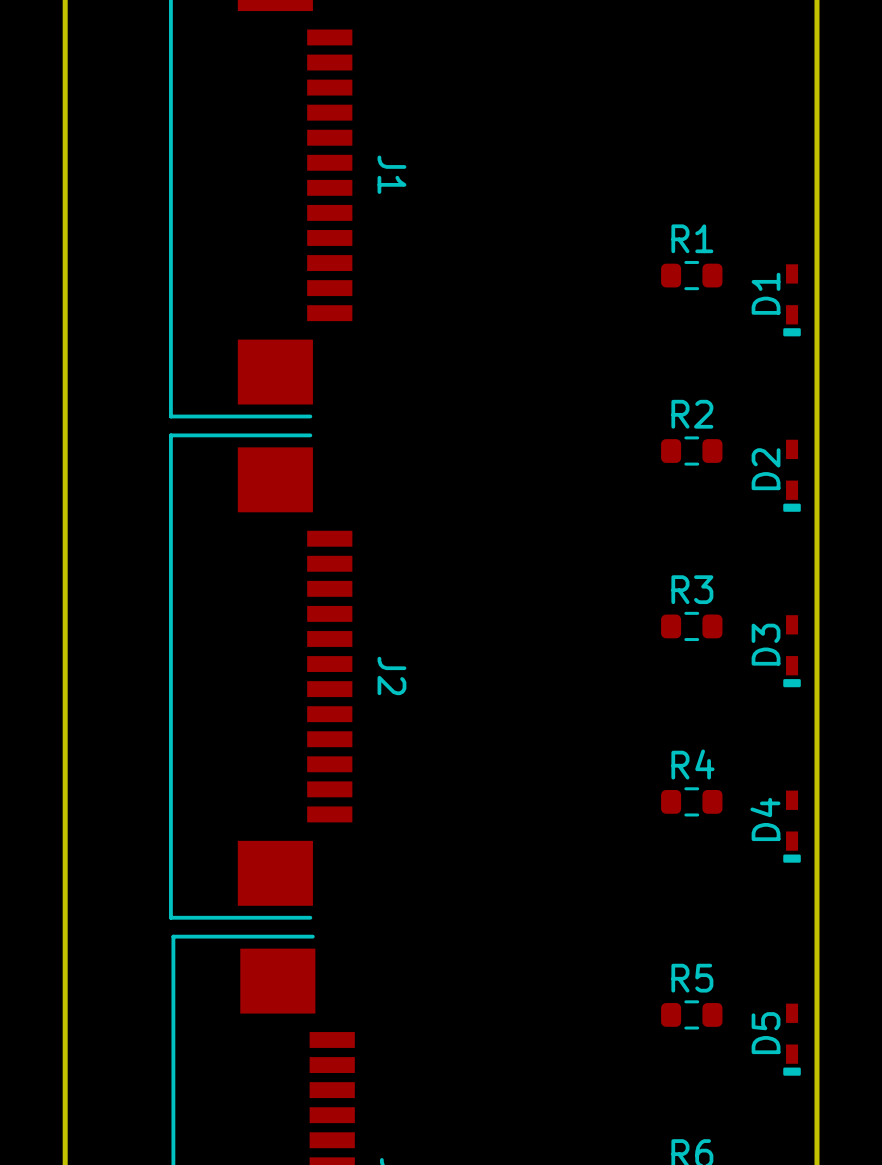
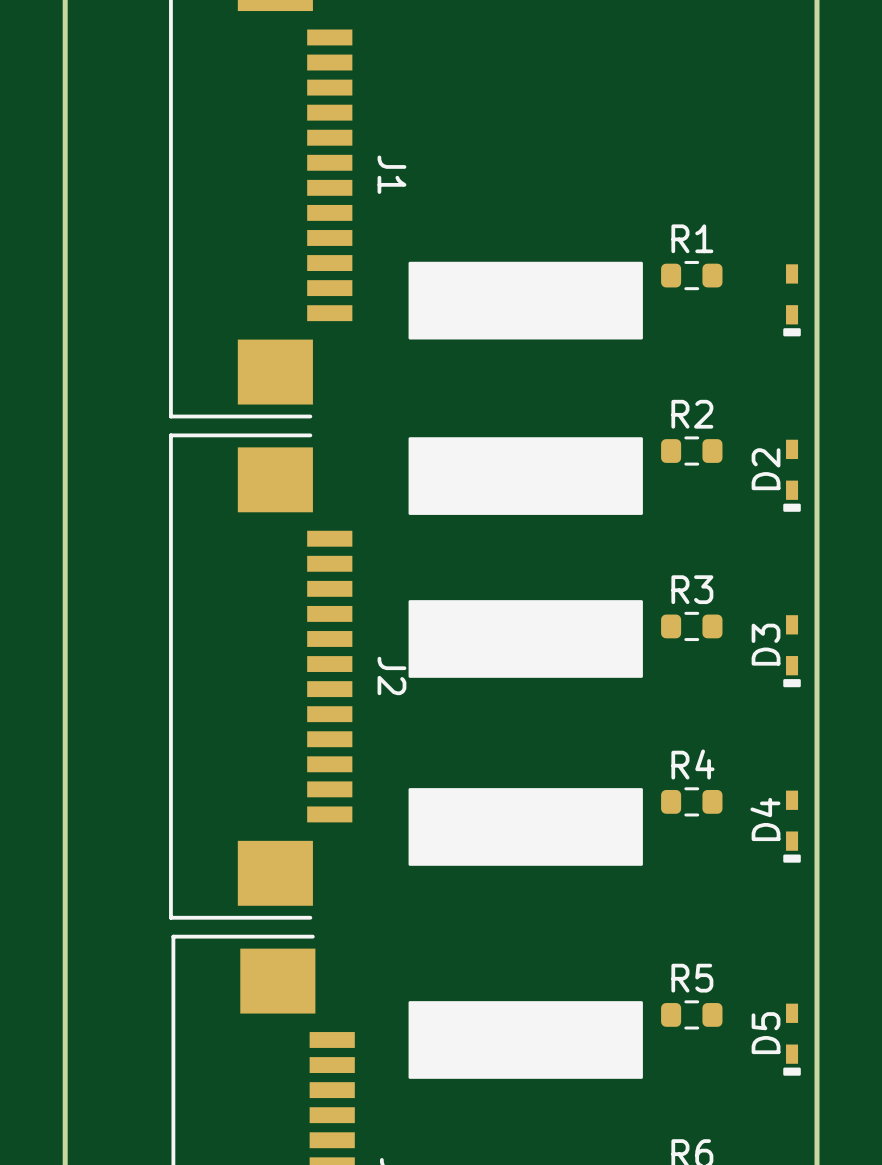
drawing: none -> [408, 261, 643, 340]
D1 name: D1 (766, 293) -> none
drawing: none -> [408, 437, 643, 515]
drawing: none -> [408, 600, 643, 678]
drawing: none -> [408, 788, 643, 866]
drawing: none -> [408, 1001, 643, 1079]

